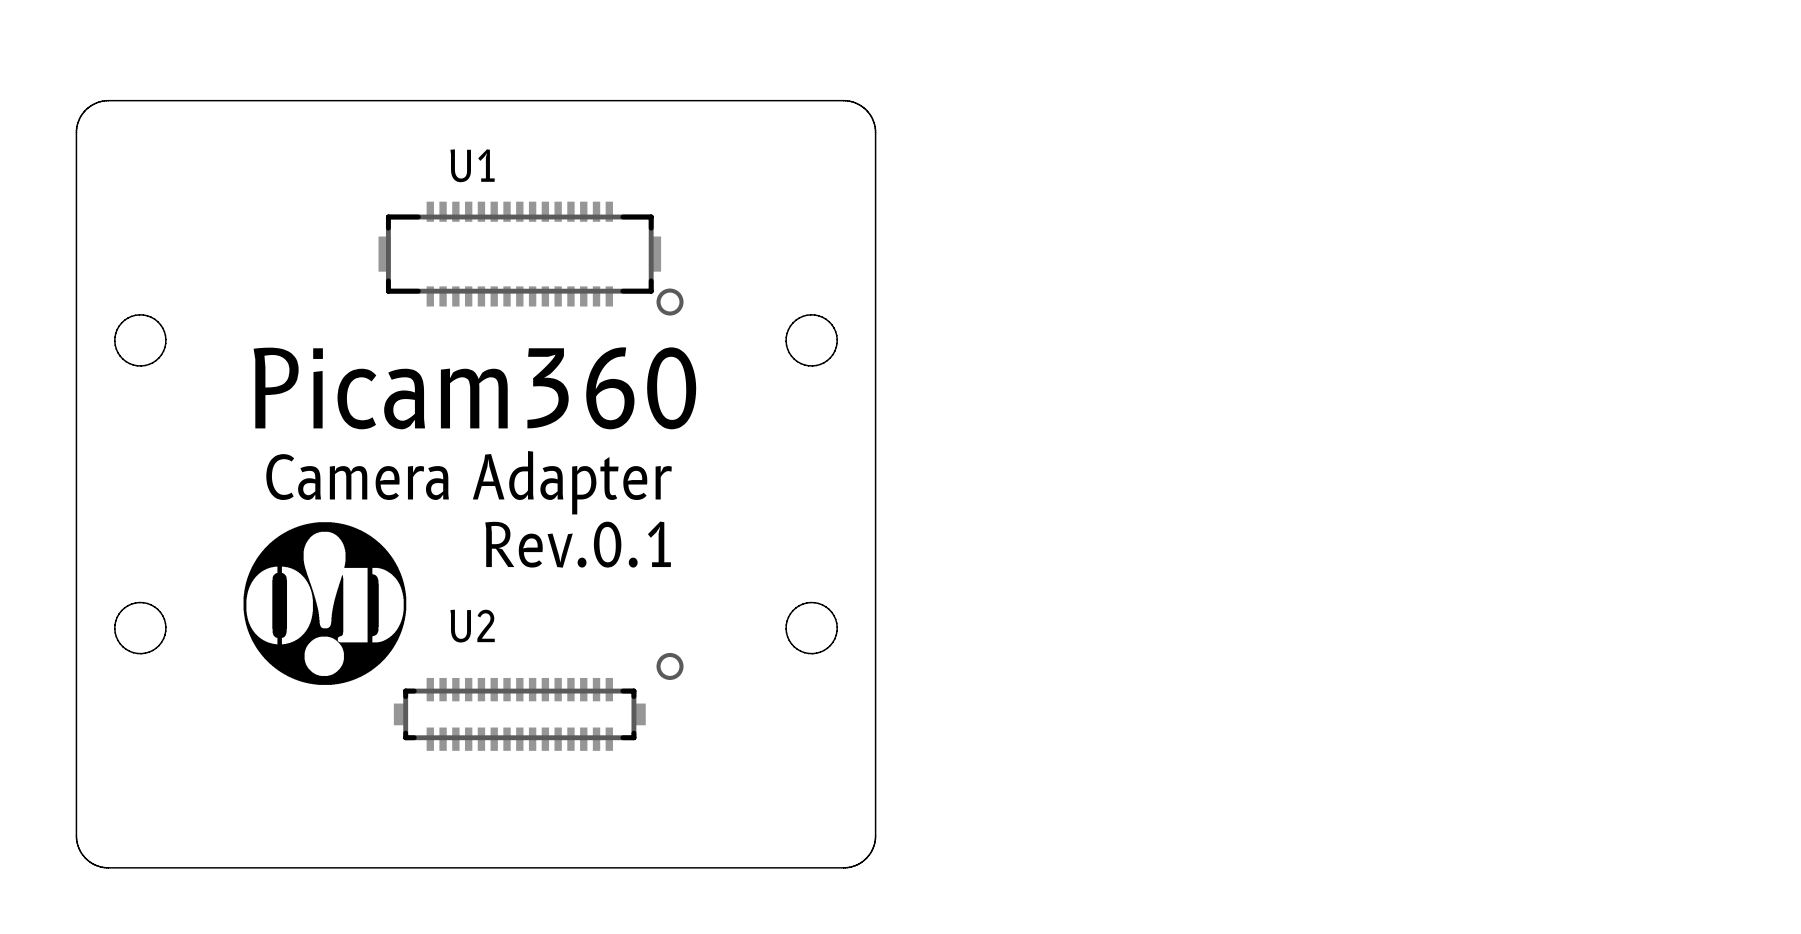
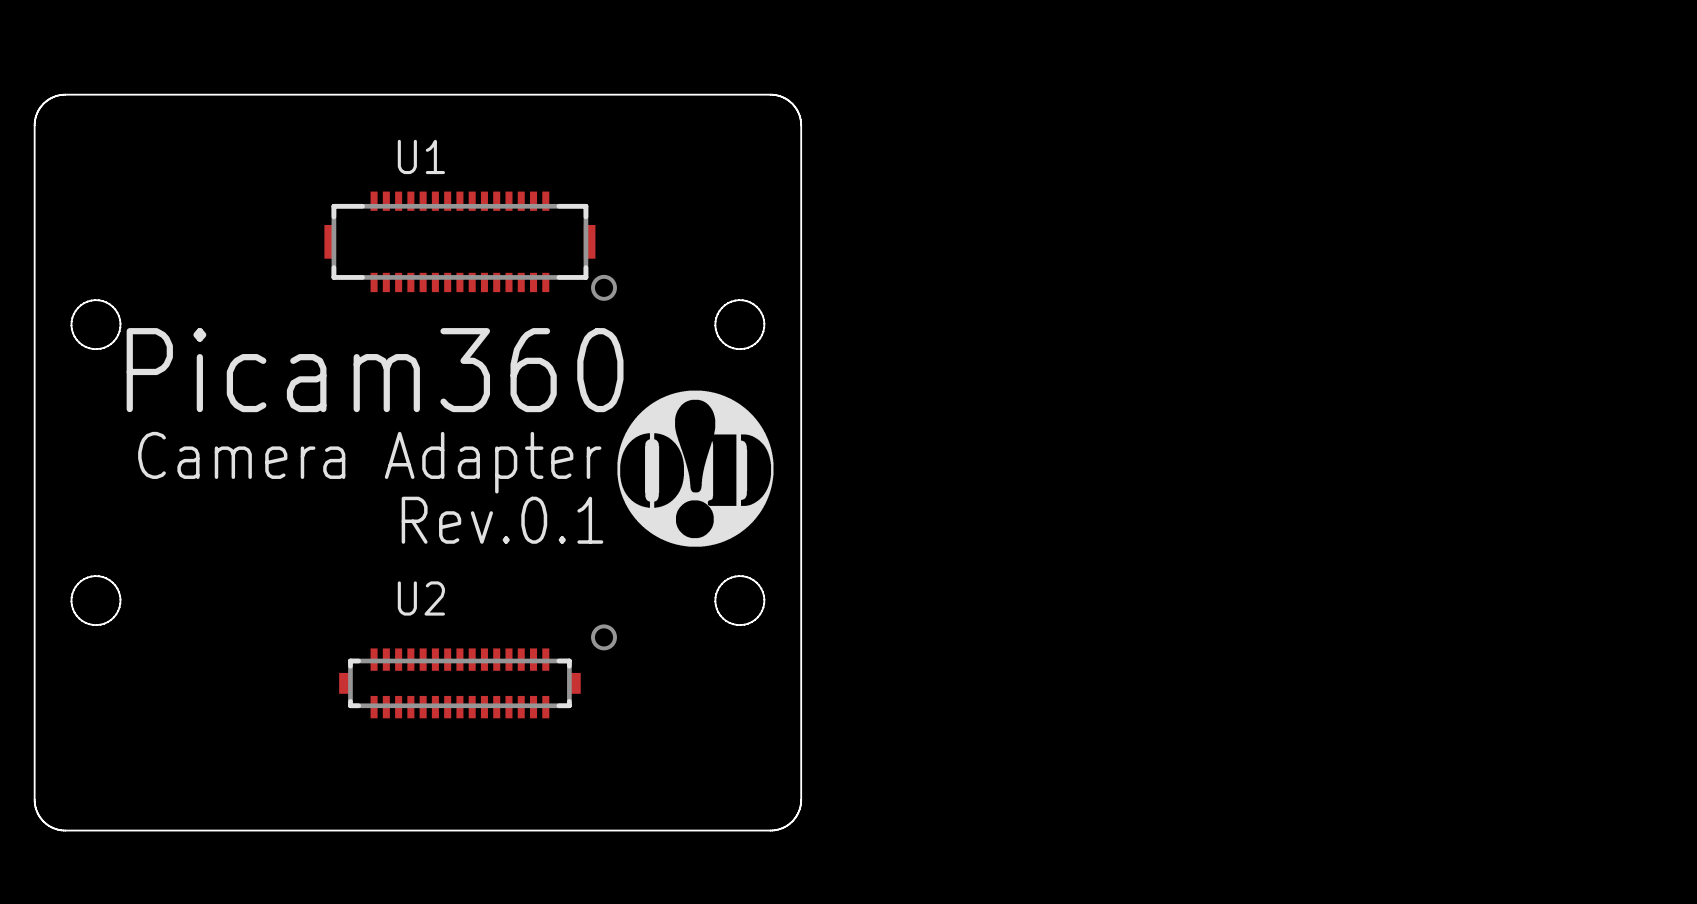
drawing position: (324, 603) -> (695, 468)

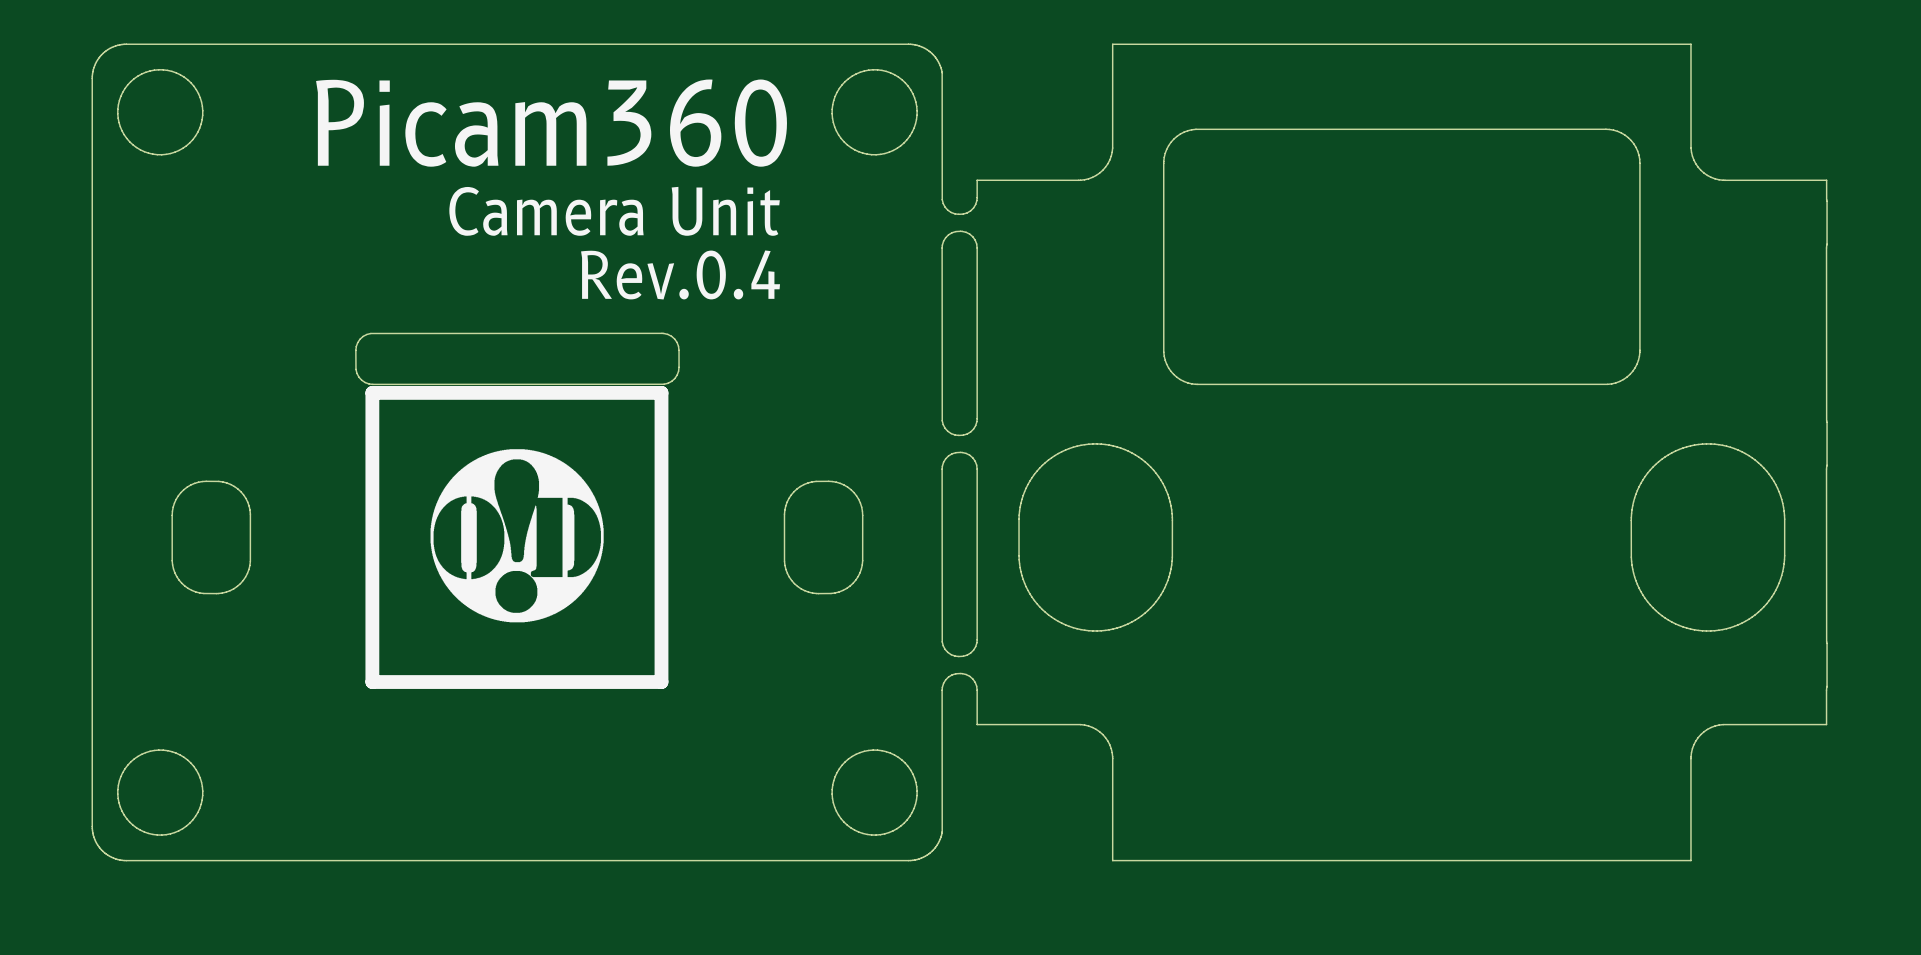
board edge: none -> (158, 69) (141, 74) (130, 81) (120, 96) (117, 113) (122, 130) (132, 144) (144, 151) (161, 154) (178, 150) (192, 139) (201, 123) (202, 110) (198, 93) (187, 79) (172, 71) (158, 69)
board edge: none -> (873, 69) (855, 74) (842, 84) (835, 96) (832, 113) (836, 130) (847, 144) (862, 153) (876, 154) (893, 150) (907, 139) (915, 123) (917, 110) (912, 93) (901, 79) (886, 71) (873, 69)
board edge: (800, 119) (800, 804) -> (942, 71) (942, 199) (947, 210) (955, 213) (967, 212) (973, 207) (976, 200) (977, 180) (1080, 180) (1092, 177) (1102, 170) (1109, 160) (1112, 148) (1112, 44) (1690, 44) (1691, 148) (1692, 156) (1698, 167) (1707, 175) (1723, 180) (1826, 180) (1827, 201) (1826, 724) (1723, 724) (1711, 727) (1700, 734) (1693, 744) (1691, 756) (1690, 860) (1112, 860) (1112, 756) (1111, 748) (1105, 737) (1096, 729) (1080, 724) (977, 724) (976, 686) (969, 676) (960, 673) (948, 677) (942, 687) (942, 831)
board edge: none -> (1195, 129) (1183, 132) (1173, 139) (1166, 149) (1163, 161) (1163, 352) (1168, 367) (1180, 379) (1197, 384) (1607, 384) (1623, 379) (1635, 367) (1639, 350) (1639, 163) (1635, 147) (1628, 137) (1621, 132) (1605, 129) (1195, 129)
text: none -> Camera Unit (614, 211)
U1: (470, 246) -> none
board edge: none -> (960, 231) (948, 234) (943, 241) (942, 247) (942, 420) (947, 431) (958, 435) (970, 431) (975, 425) (977, 418) (977, 247) (972, 236) (960, 231)
board edge: (95, 300) (84, 303) (78, 307) (72, 317) (71, 325) (74, 336) (79, 342) (89, 348) (96, 349) (107, 346) (113, 341) (119, 331) (120, 323) (117, 312) (112, 306) (102, 301) (95, 300) -> none
board edge: (739, 300) (727, 303) (721, 307) (717, 314) (715, 325) (716, 333) (723, 342) (733, 348) (740, 349) (751, 346) (757, 341) (763, 331) (764, 323) (761, 312) (756, 306) (746, 301) (739, 300) -> none
text: none -> Rev.0.4 (680, 274)
board edge: none -> (370, 333) (360, 339) (355, 350) (356, 373) (361, 380) (369, 383) (664, 384) (671, 381) (678, 371) (679, 350) (677, 342) (671, 336) (663, 333) (370, 333)
text position: Picam360 (375, 370) -> Picam360 (551, 123)
line: none -> (372, 392) (372, 682) (661, 682) (661, 392) (372, 392)
board edge: none -> (1092, 443) (1077, 446) (1058, 453) (1042, 465) (1032, 477) (1024, 491) (1020, 507) (1019, 555) (1020, 571) (1026, 586) (1042, 609) (1054, 619) (1069, 626) (1097, 630) (1116, 628) (1131, 622) (1148, 610) (1158, 598) (1166, 584) (1171, 569) (1172, 517) (1170, 501) (1164, 486) (1148, 464) (1135, 454) (1120, 448) (1092, 443)
board edge: none -> (1706, 443) (1686, 446) (1671, 452) (1655, 464) (1645, 476) (1637, 490) (1632, 505) (1631, 557) (1633, 572) (1639, 588) (1655, 610) (1668, 620) (1682, 626) (1710, 630) (1726, 628) (1745, 621) (1761, 609) (1771, 597) (1779, 583) (1783, 567) (1784, 519) (1782, 503) (1777, 488) (1761, 465) (1748, 455) (1734, 448) (1706, 443)
text: Camera Adapter (369, 462) -> none
board edge: none -> (960, 452) (948, 455) (943, 462) (942, 469) (942, 641) (947, 652) (958, 656) (970, 652) (975, 646) (977, 639) (977, 469) (972, 457) (960, 452)
drawing position: (695, 468) -> (517, 535)
board edge: none -> (206, 481) (187, 487) (178, 495) (174, 503) (172, 515) (172, 564) (176, 576) (188, 588) (199, 592) (222, 593) (233, 588) (240, 583) (248, 569) (250, 510) (245, 498) (234, 486) (222, 481) (206, 481)
board edge: none -> (816, 481) (804, 484) (797, 488) (787, 502) (784, 514) (784, 565) (789, 577) (800, 588) (812, 593) (835, 592) (843, 590) (853, 583) (861, 568) (862, 511) (858, 499) (847, 487) (836, 482) (816, 481)
text: Rev.0.1 (502, 520) -> none
board edge: (95, 576) (87, 577) (78, 583) (72, 593) (71, 601) (74, 612) (79, 618) (89, 624) (96, 625) (107, 622) (113, 617) (119, 607) (120, 599) (117, 588) (112, 582) (106, 578) (95, 576) -> none
board edge: (739, 576) (731, 577) (721, 583) (717, 590) (715, 601) (716, 608) (723, 618) (733, 624) (740, 625) (751, 622) (757, 617) (763, 607) (764, 599) (761, 588) (756, 582) (750, 578) (739, 576) -> none
U2: (478, 671) -> none
board edge: none -> (158, 750) (141, 754) (130, 761) (120, 776) (117, 794) (122, 811) (132, 825) (144, 832) (161, 835) (178, 830) (192, 819) (201, 804) (202, 791) (198, 773) (187, 760) (172, 751) (158, 750)
board edge: none -> (873, 750) (855, 754) (842, 765) (833, 780) (832, 794) (836, 811) (847, 825) (862, 833) (876, 835) (893, 830) (907, 819) (915, 804) (917, 791) (912, 773) (901, 760) (886, 751) (873, 750)

